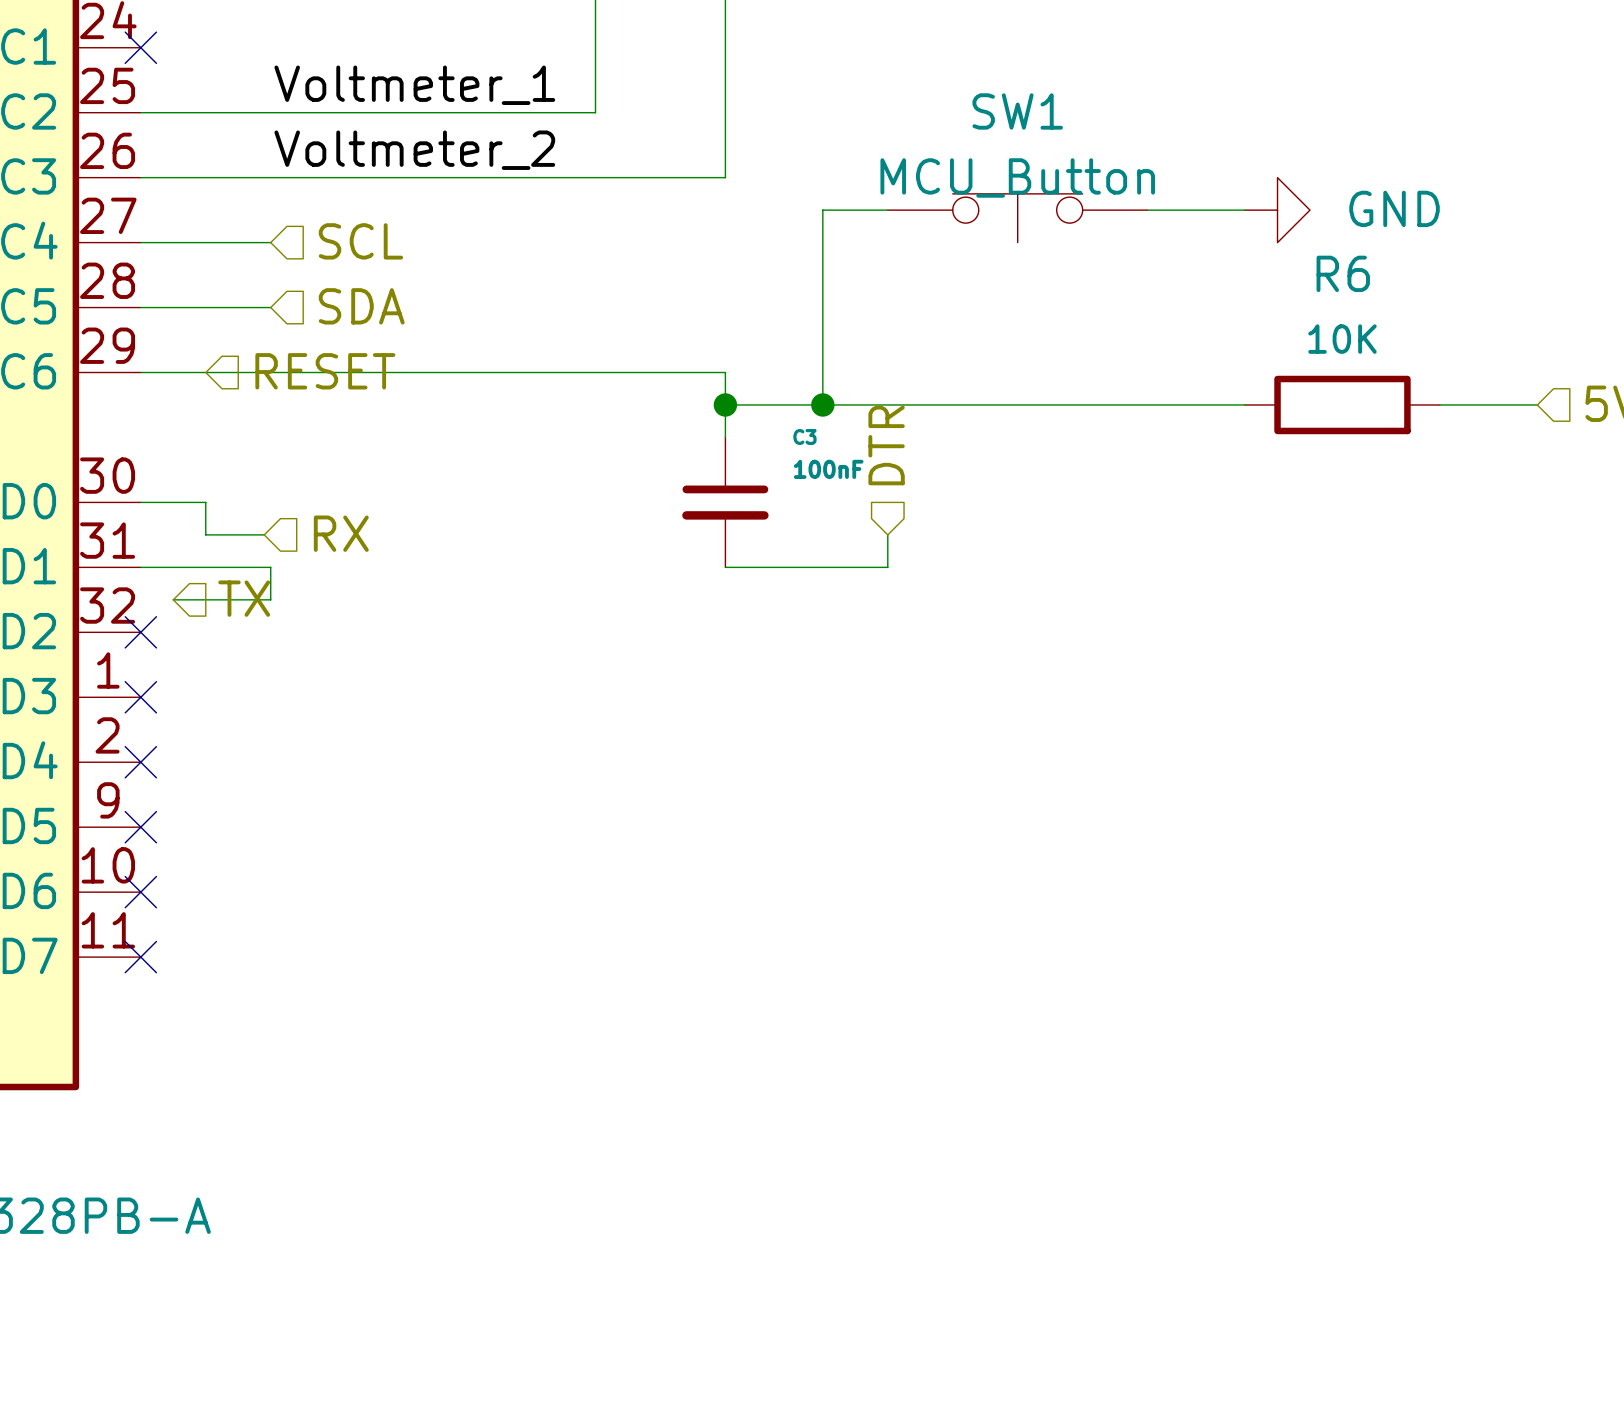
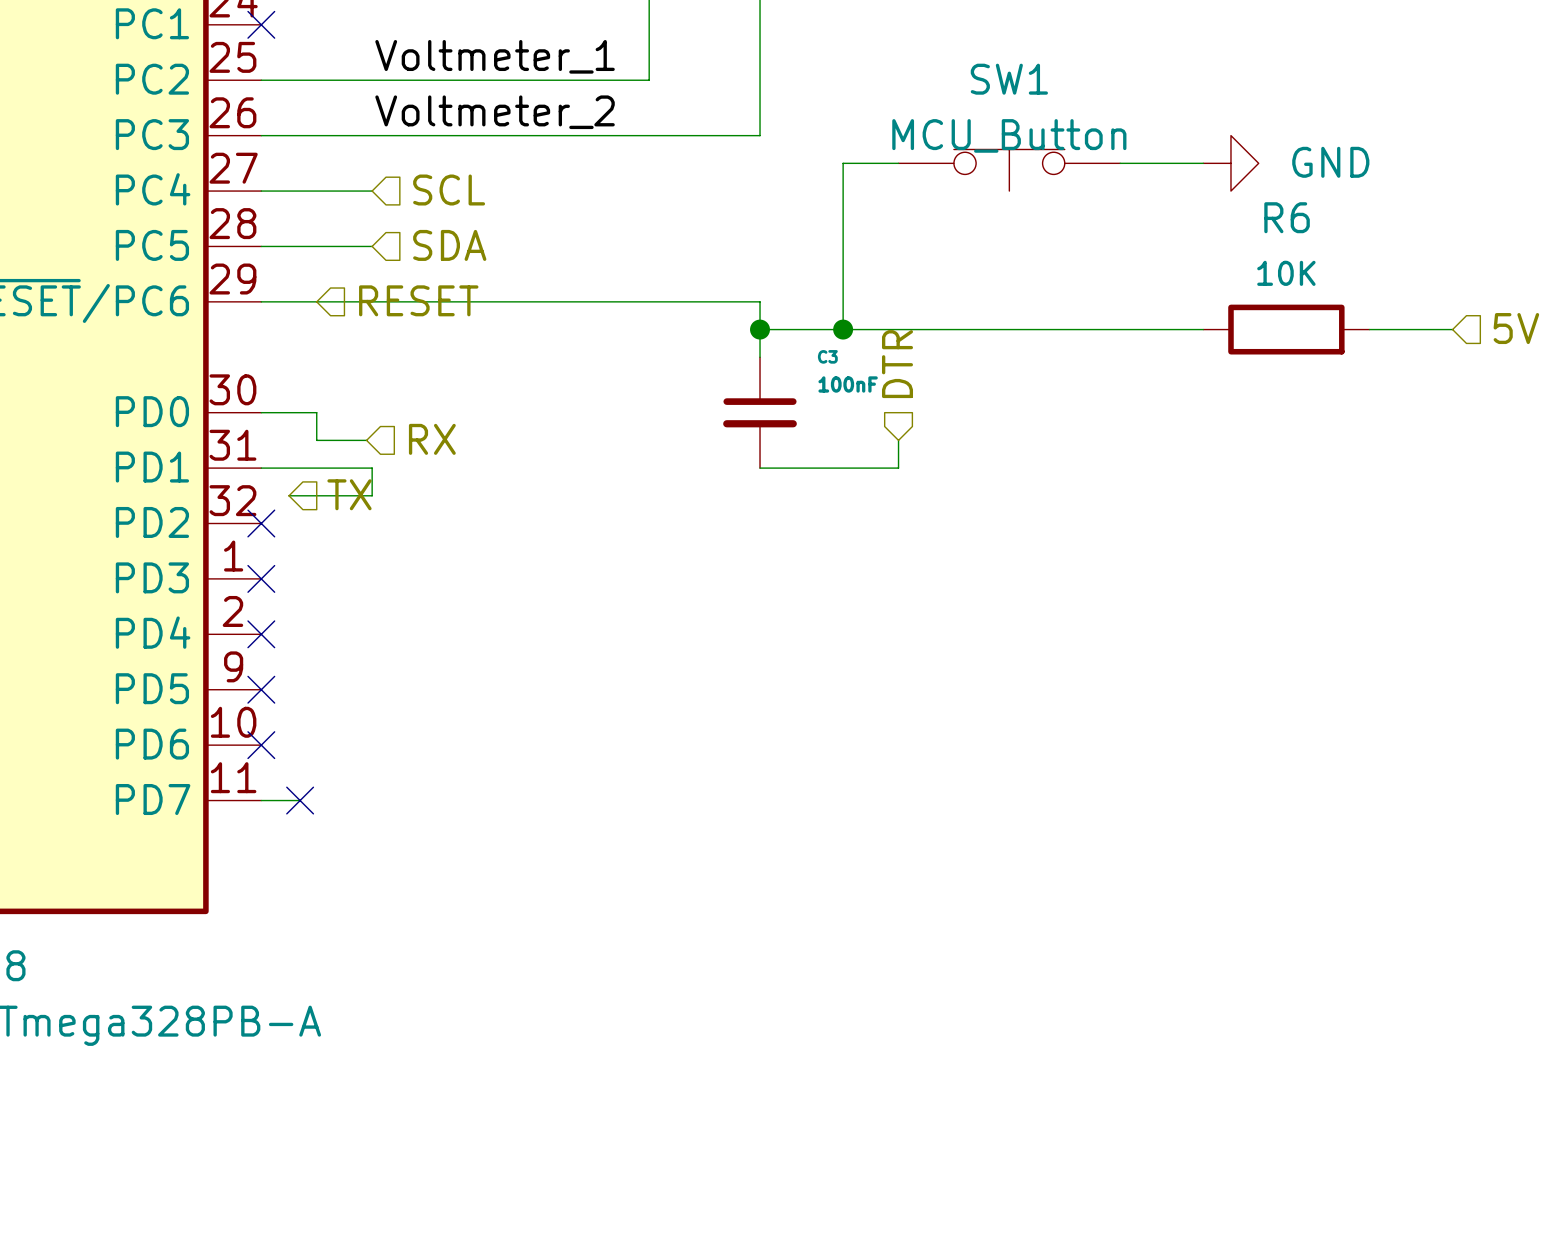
wire: none -> (261, 800) (300, 800)
no-connect mark position: (140, 957) -> (300, 800)

